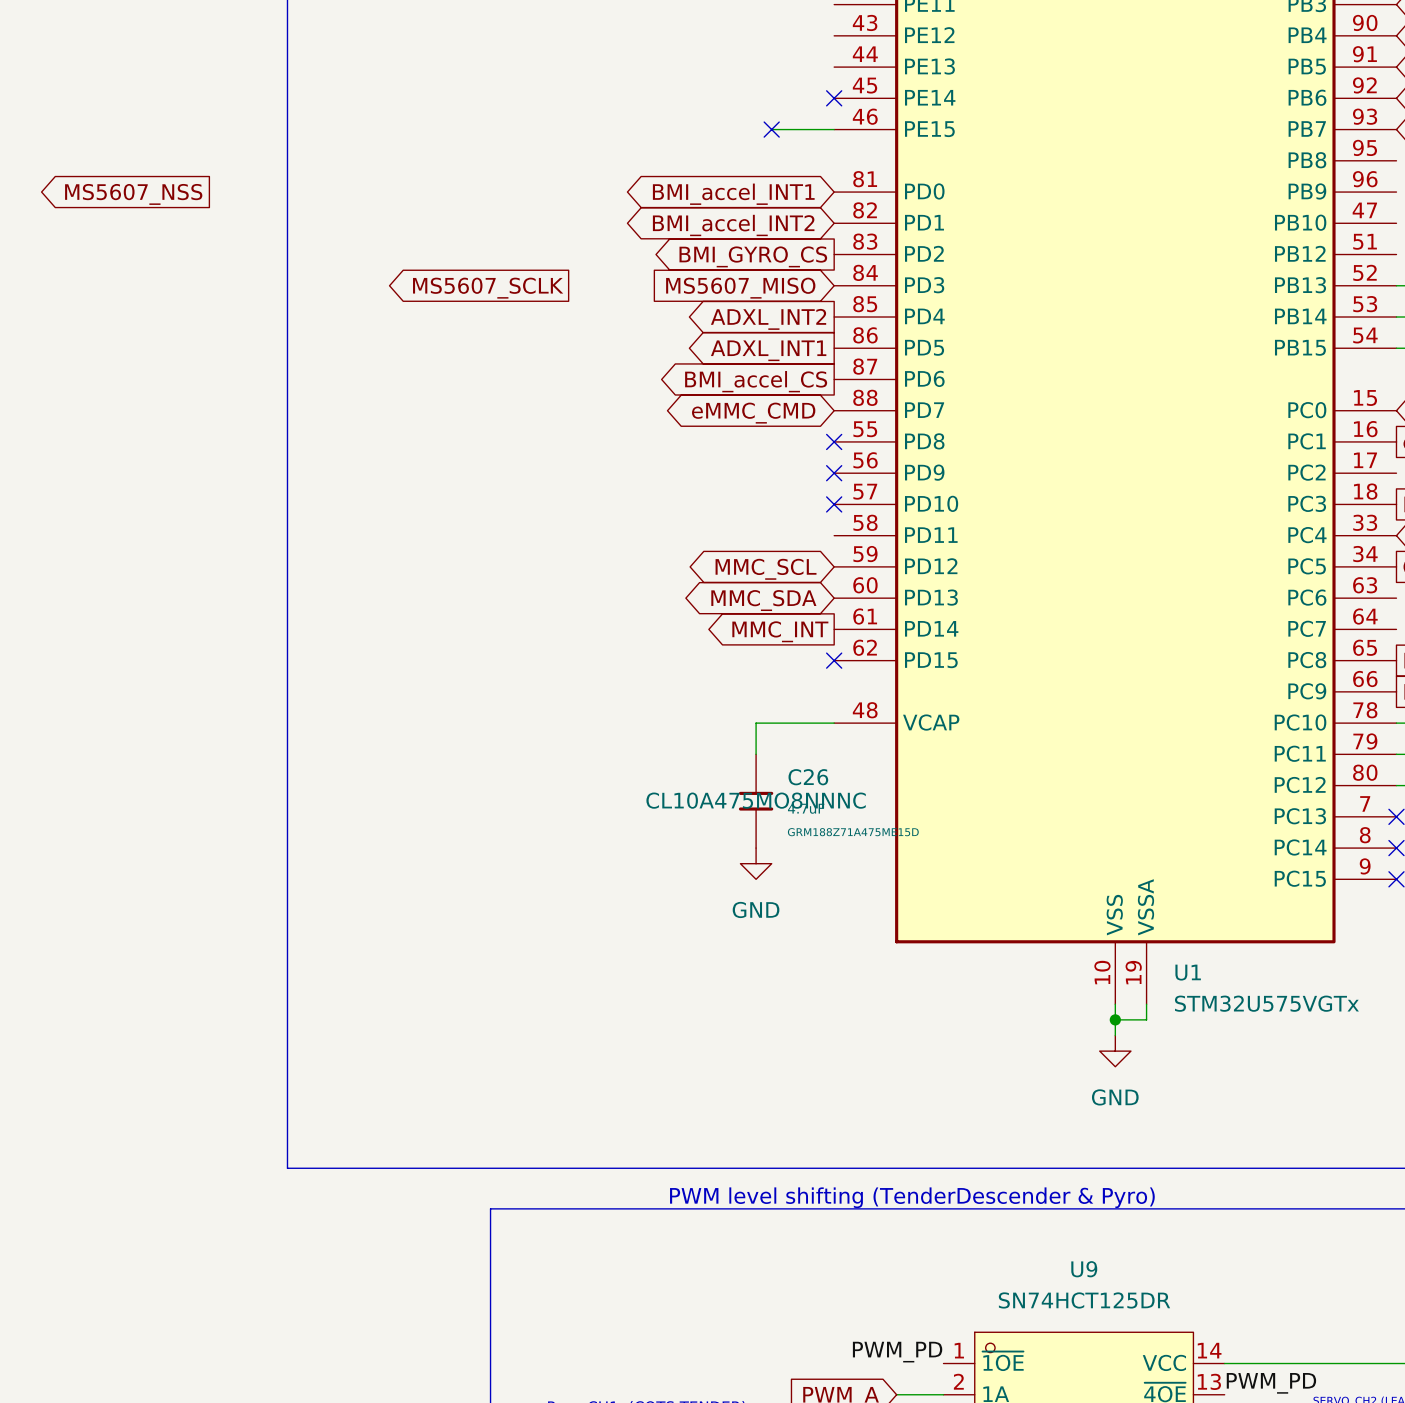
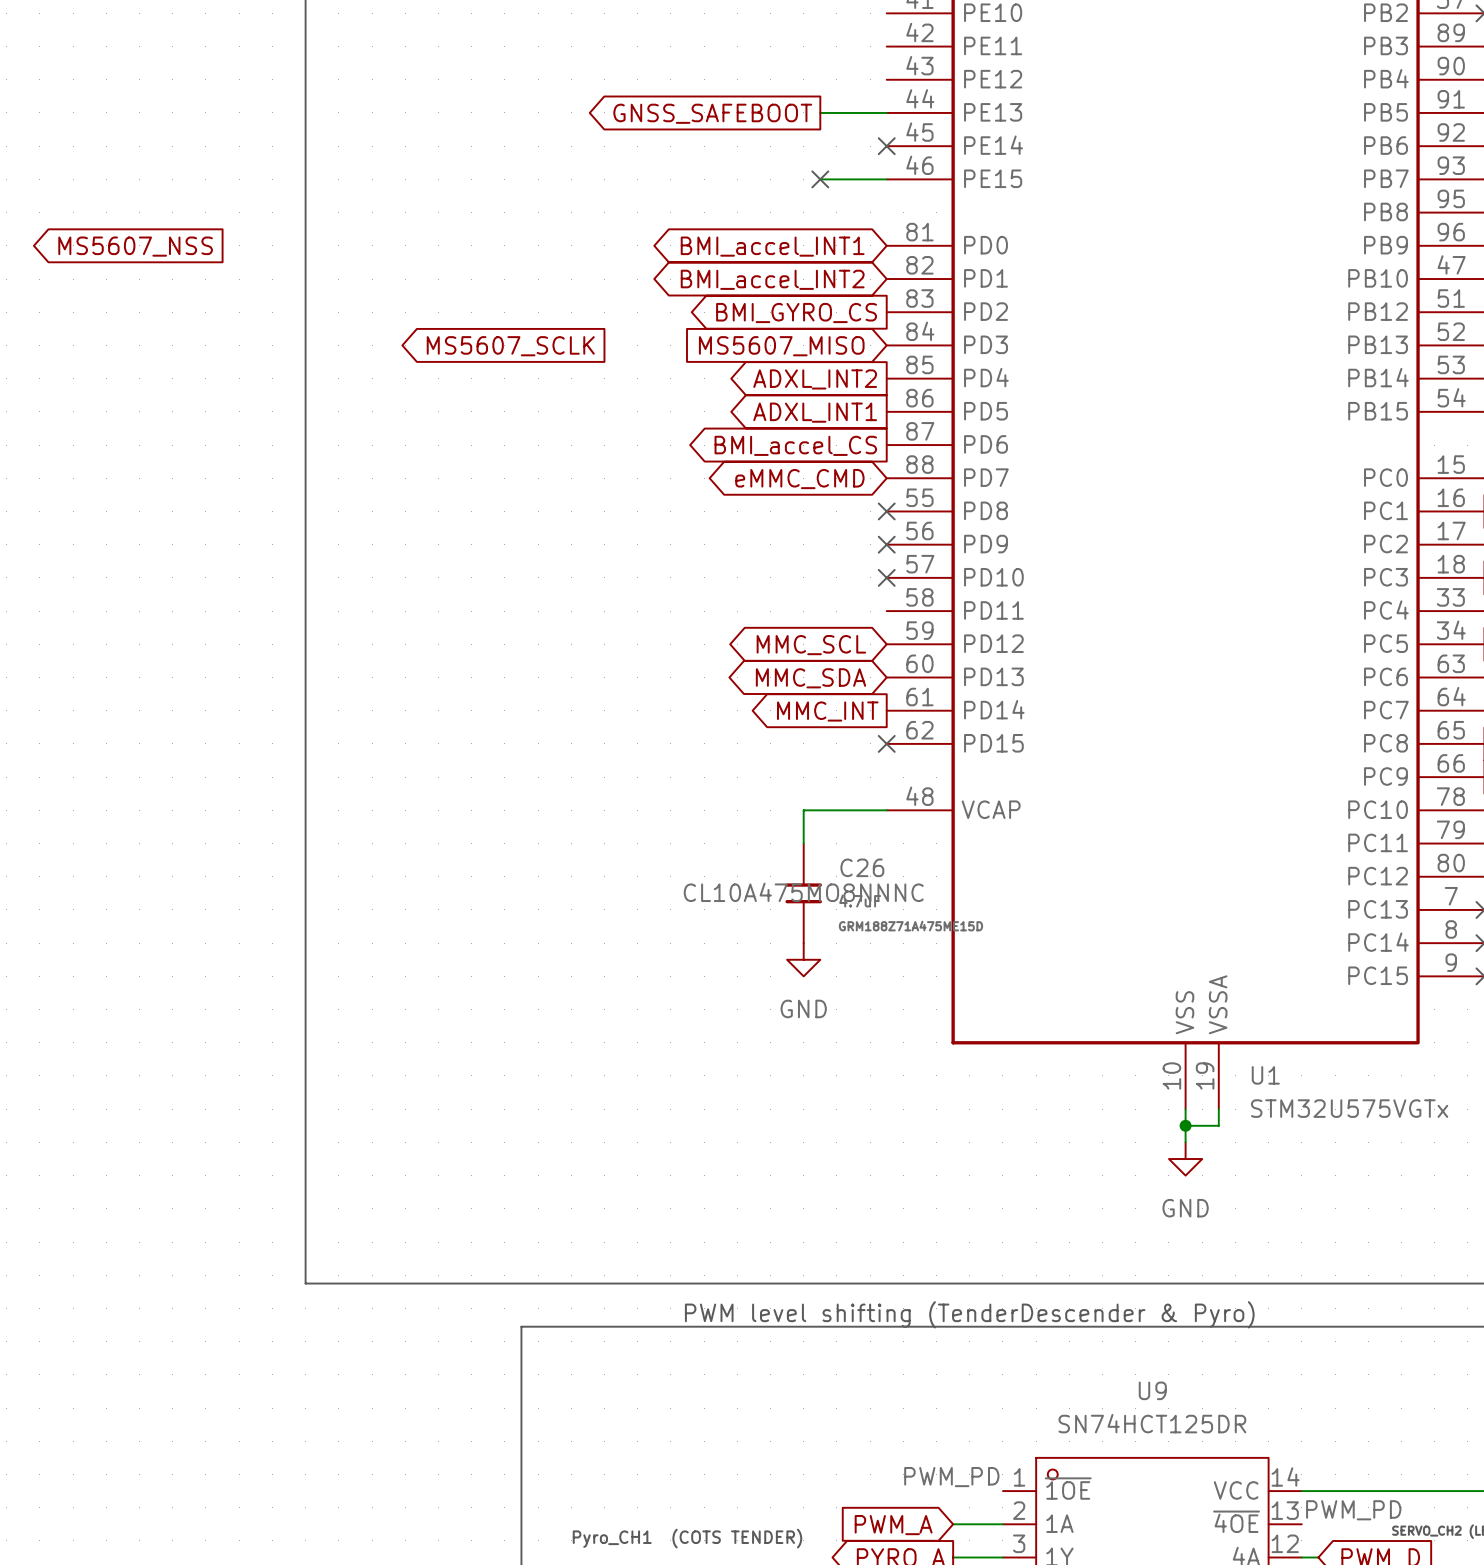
wire: none -> (820, 112) (886, 112)
global label: none -> GNSS_SAFEBOOT (712, 113)

